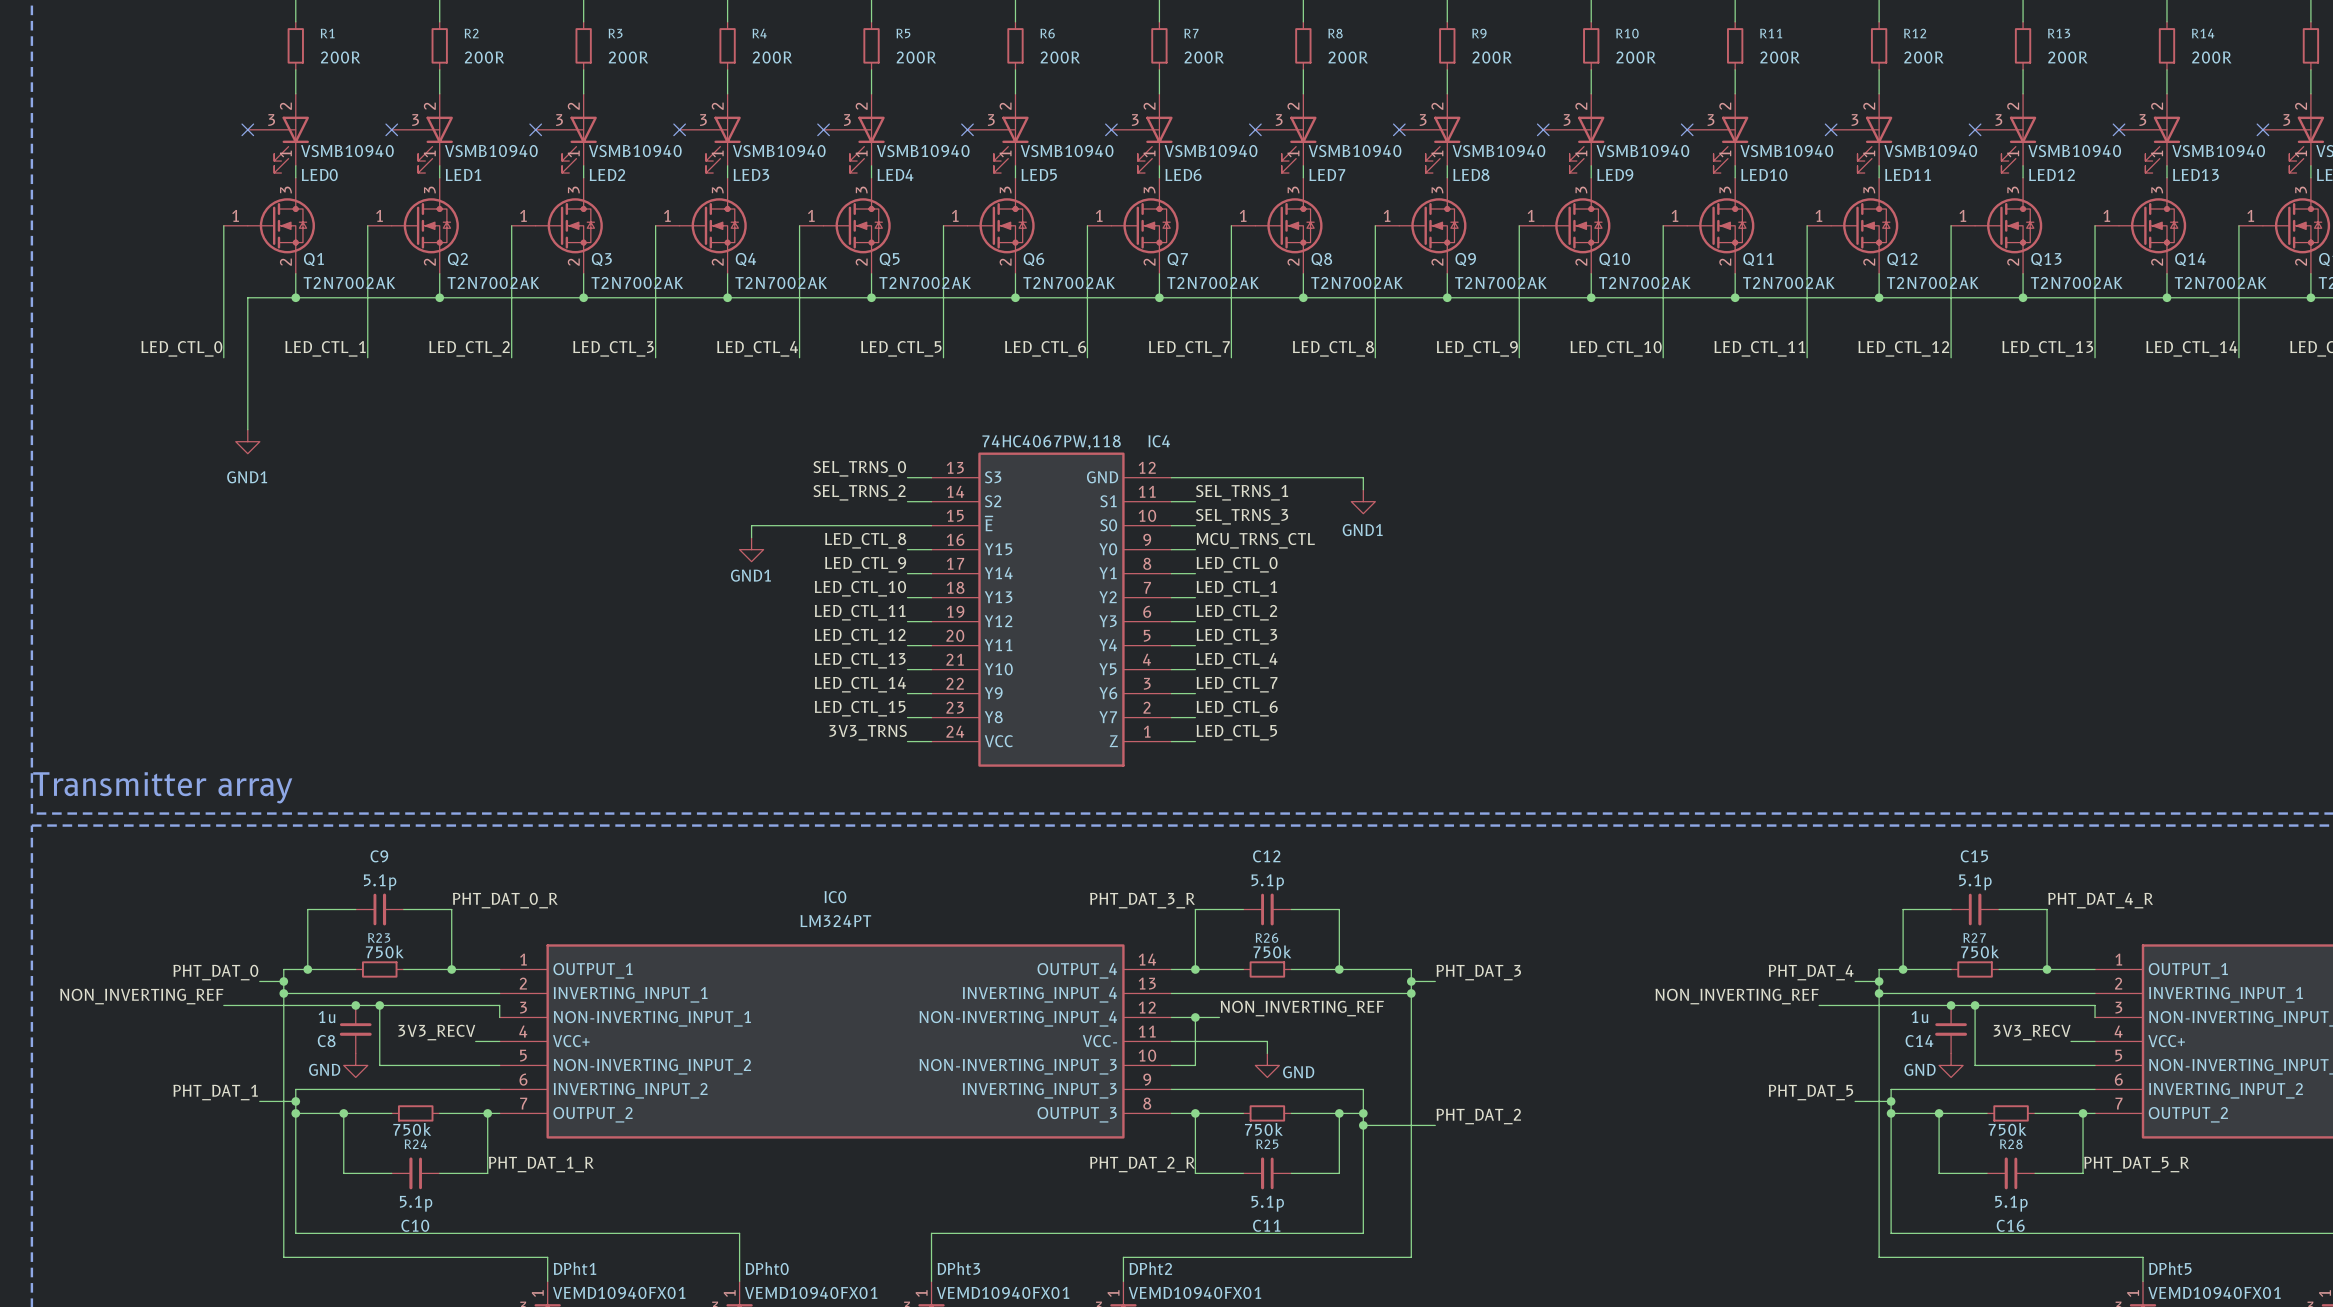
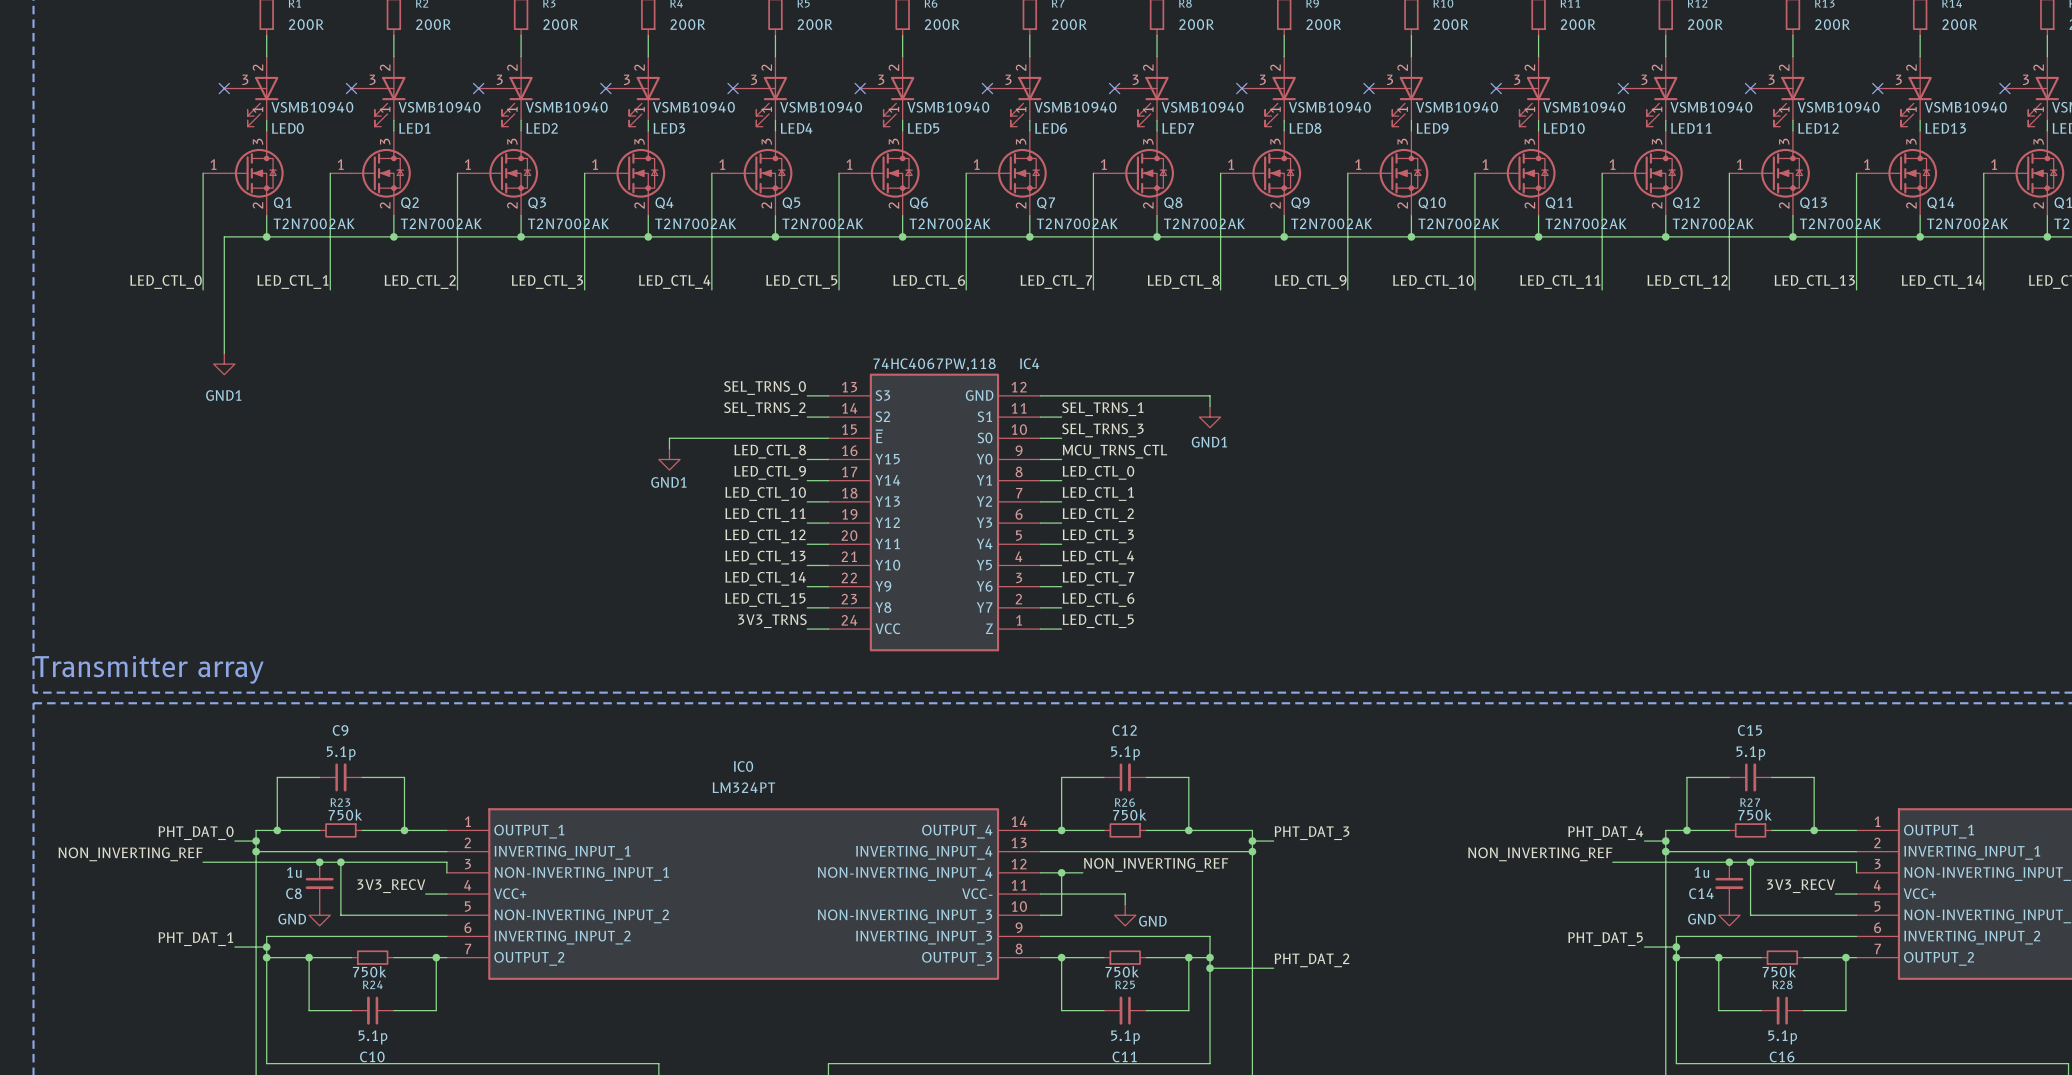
label: PHT_DAT_0_R (505, 900) -> none
label: PHT_DAT_3_R (1142, 900) -> none
label: PHT_DAT_4_R (2100, 900) -> none
label: PHT_DAT_1_R (541, 1164) -> none
label: PHT_DAT_2_R (1142, 1164) -> none
label: PHT_DAT_5_R (2136, 1164) -> none

